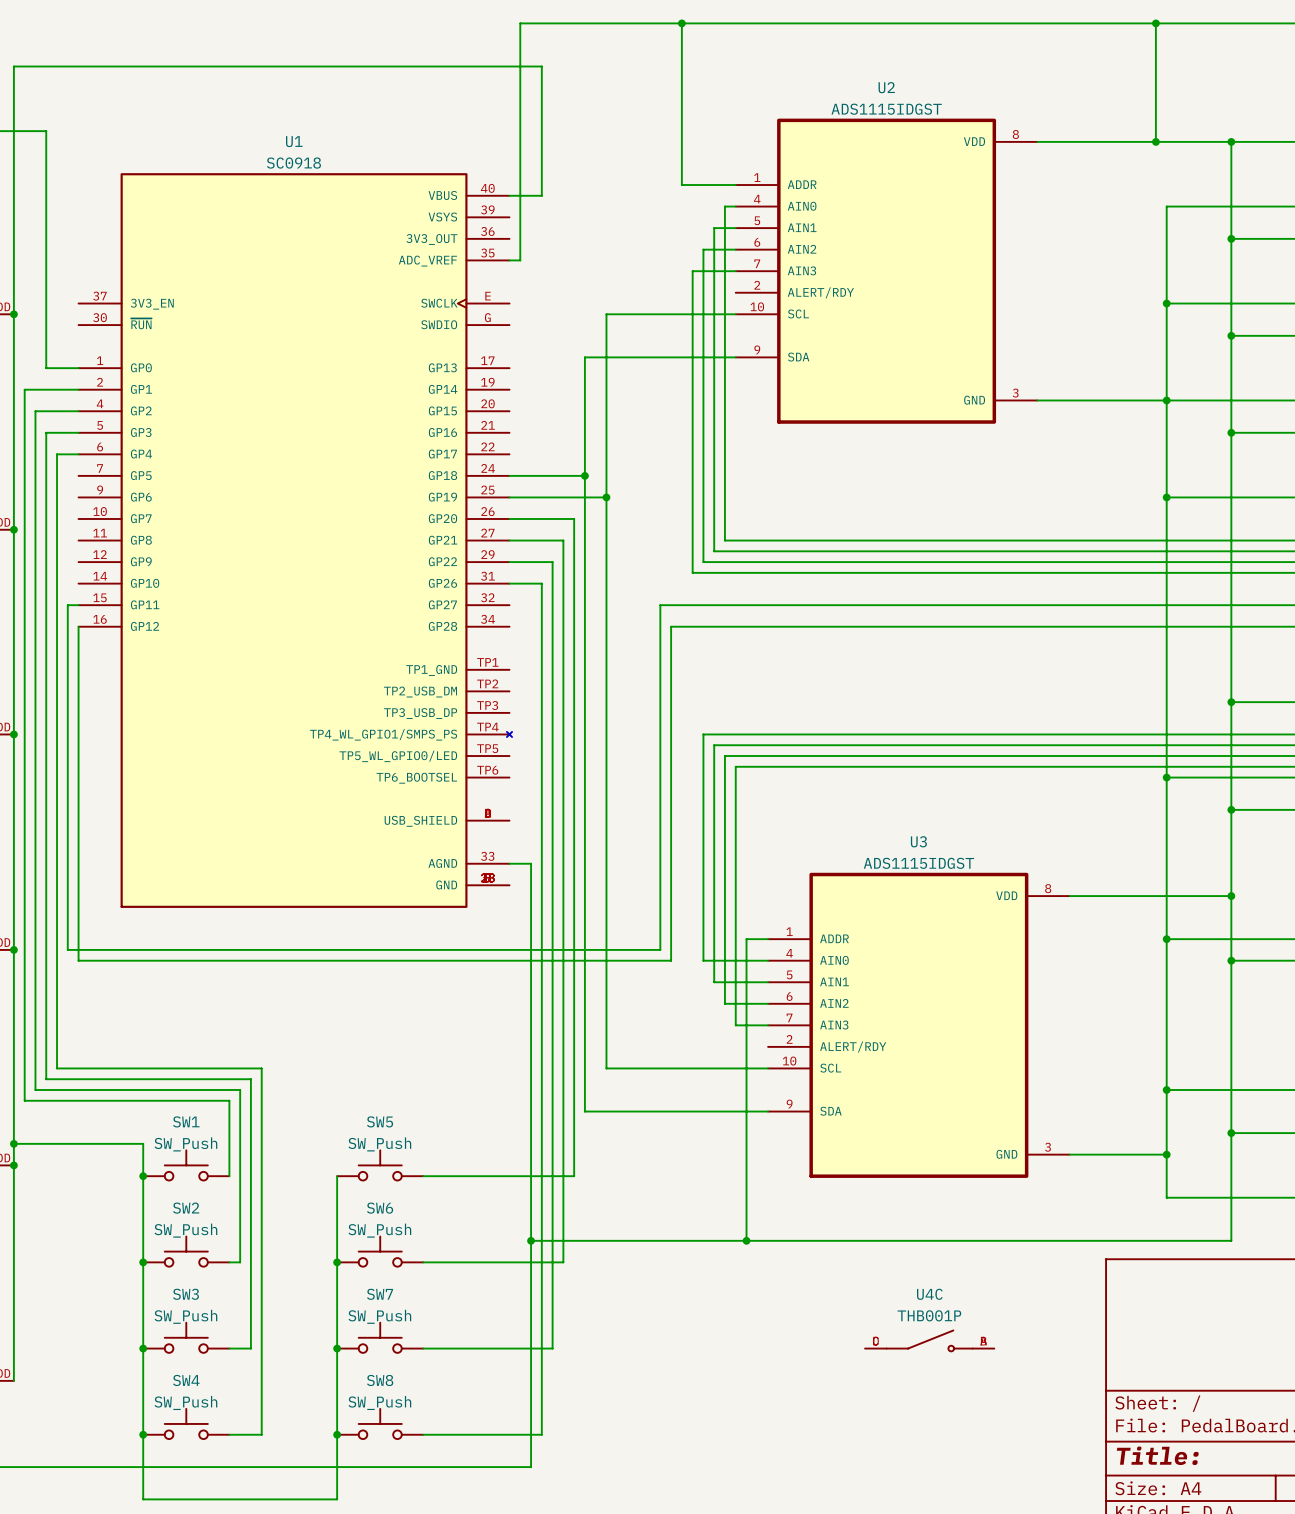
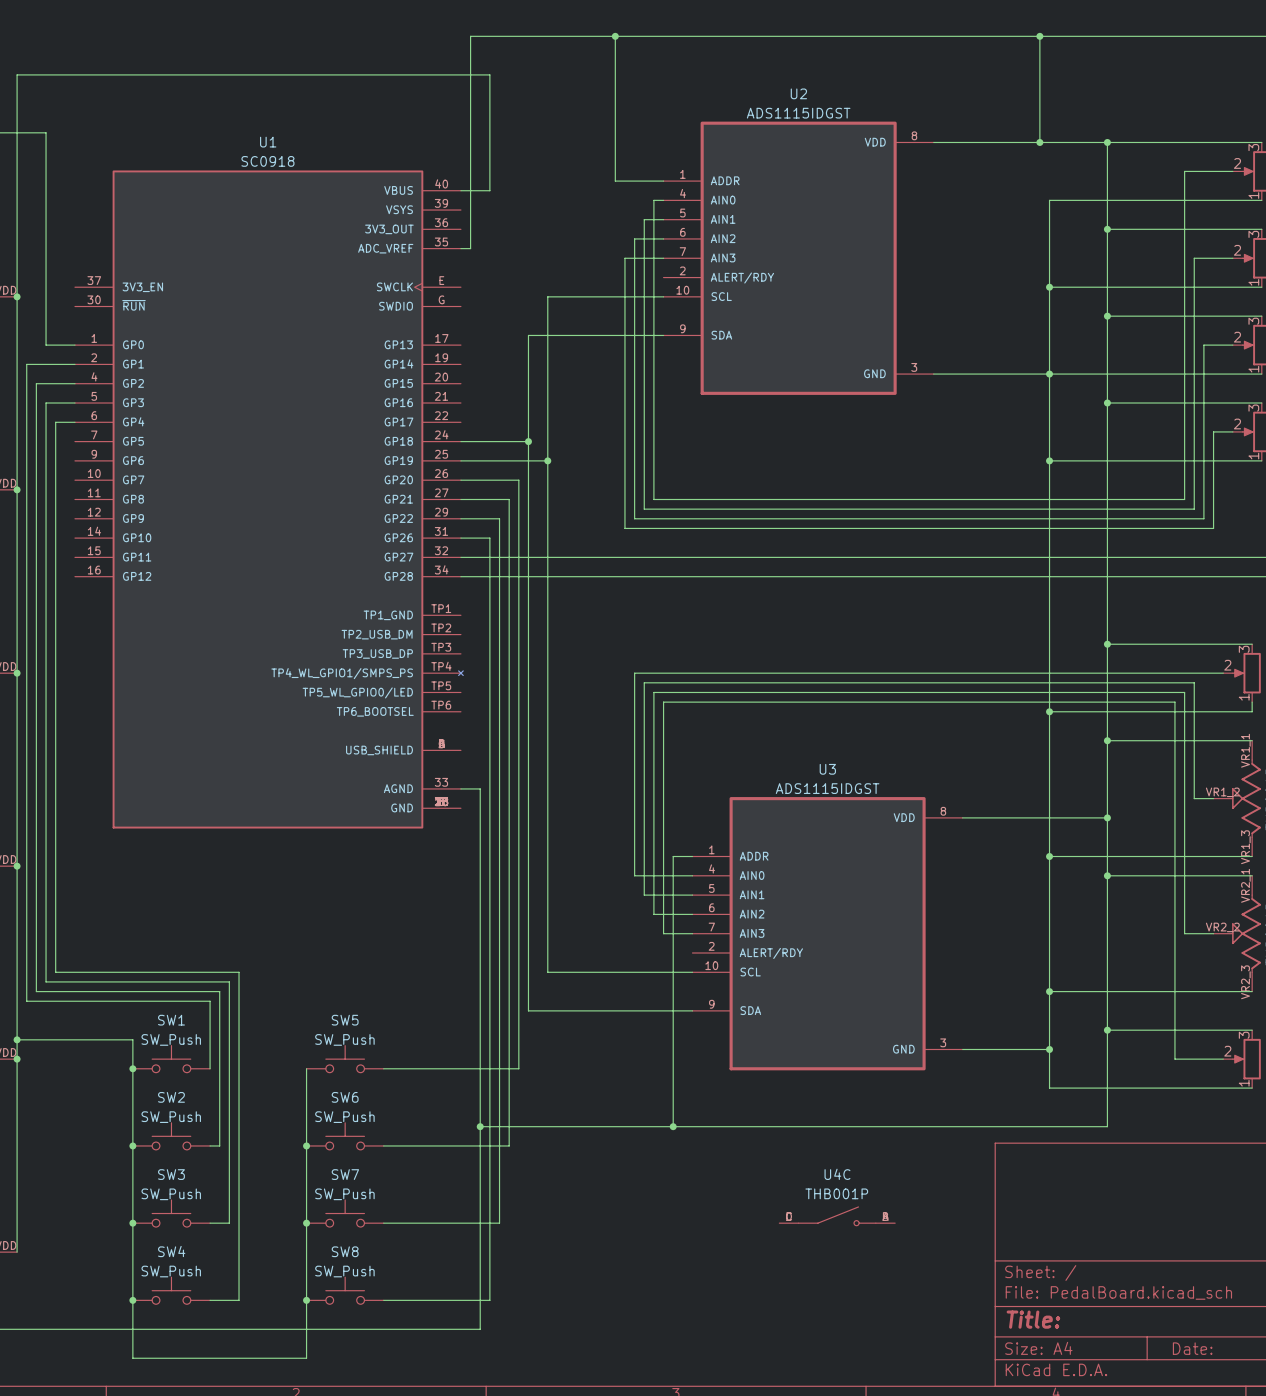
wire: (78, 605) (67, 605) (67, 949) (660, 949) (660, 605) -> (460, 557) (596, 557)
wire: (78, 626) (78, 960) (671, 960) (671, 626) -> (460, 576) (605, 576)

